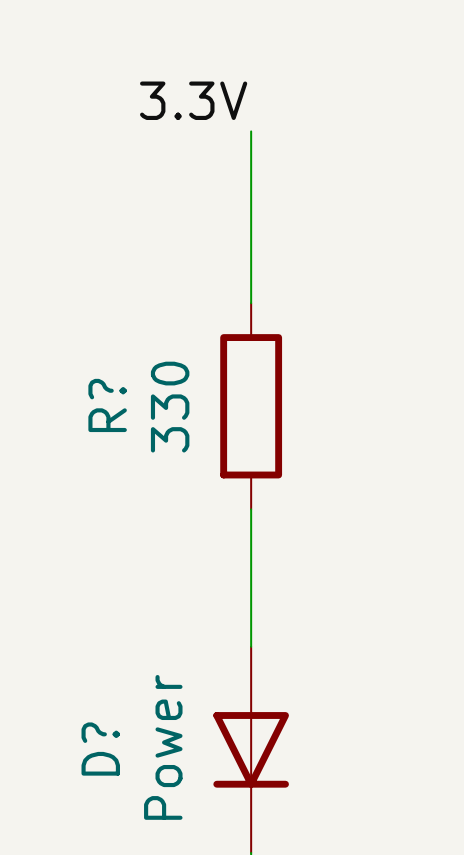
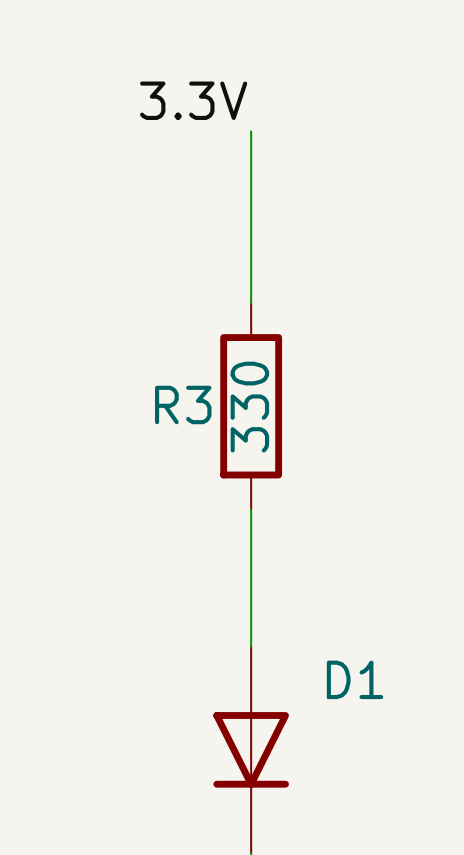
R? name: R? (107, 405) -> R3 (183, 404)
R? value position: 330 (170, 407) -> 330 (249, 407)
D? value: Power (163, 747) -> none
D? name: D? (100, 749) -> D1 (355, 679)

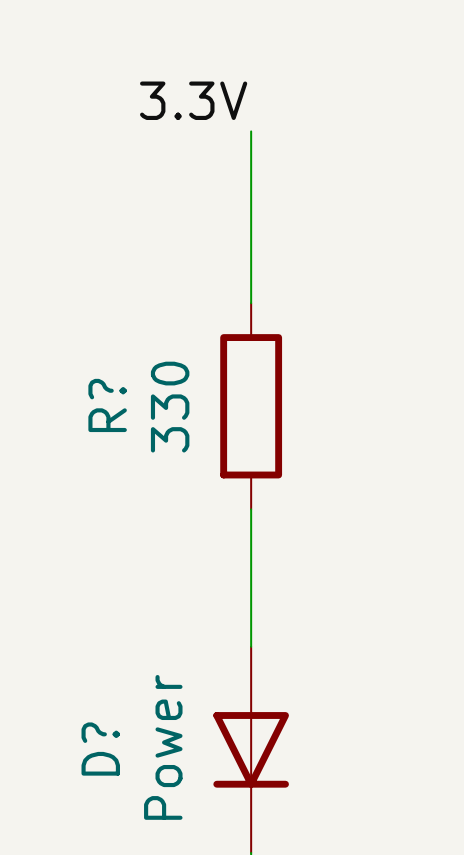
R3 name: R3 (183, 404) -> R? (107, 405)
R3 value position: 330 (249, 407) -> 330 (170, 407)
D1 name: D1 (355, 679) -> D? (100, 749)
D1 value: none -> Power (163, 747)

